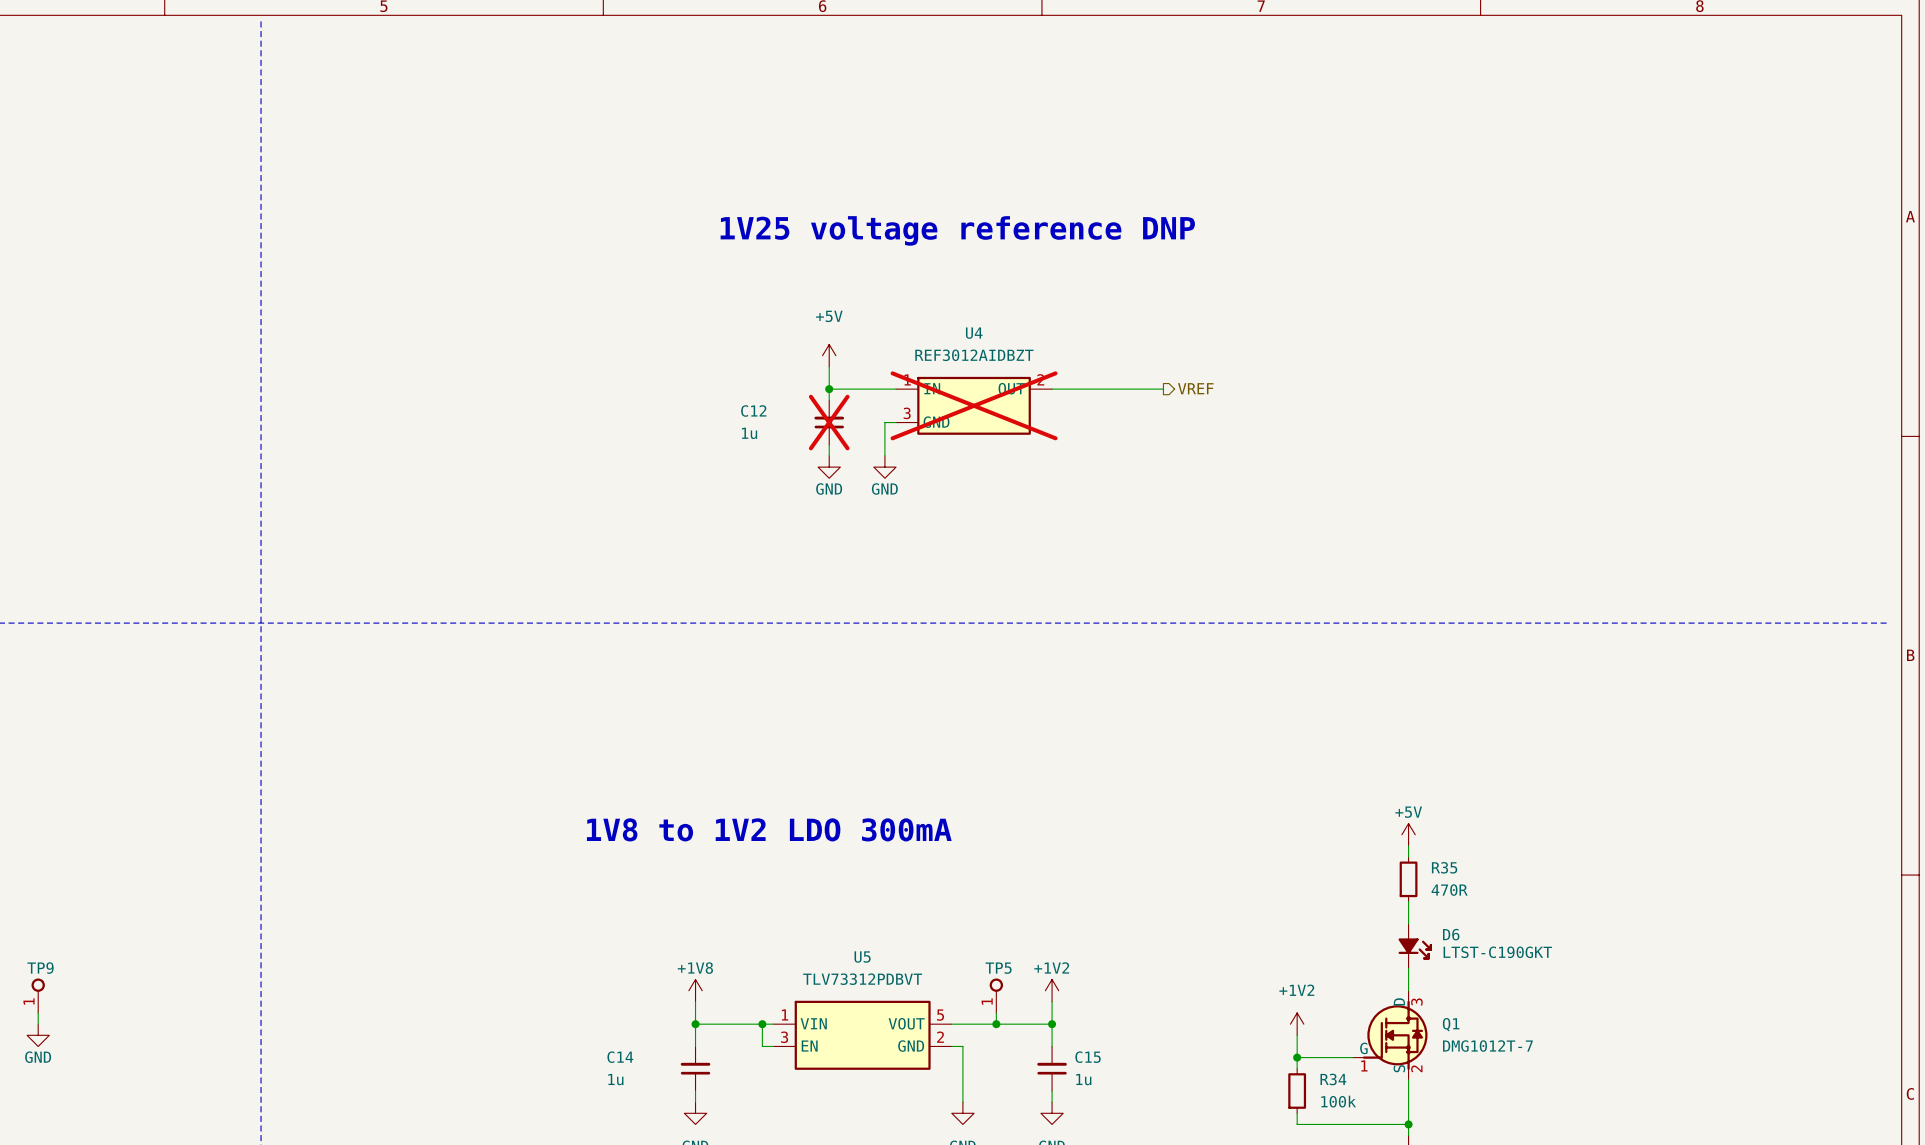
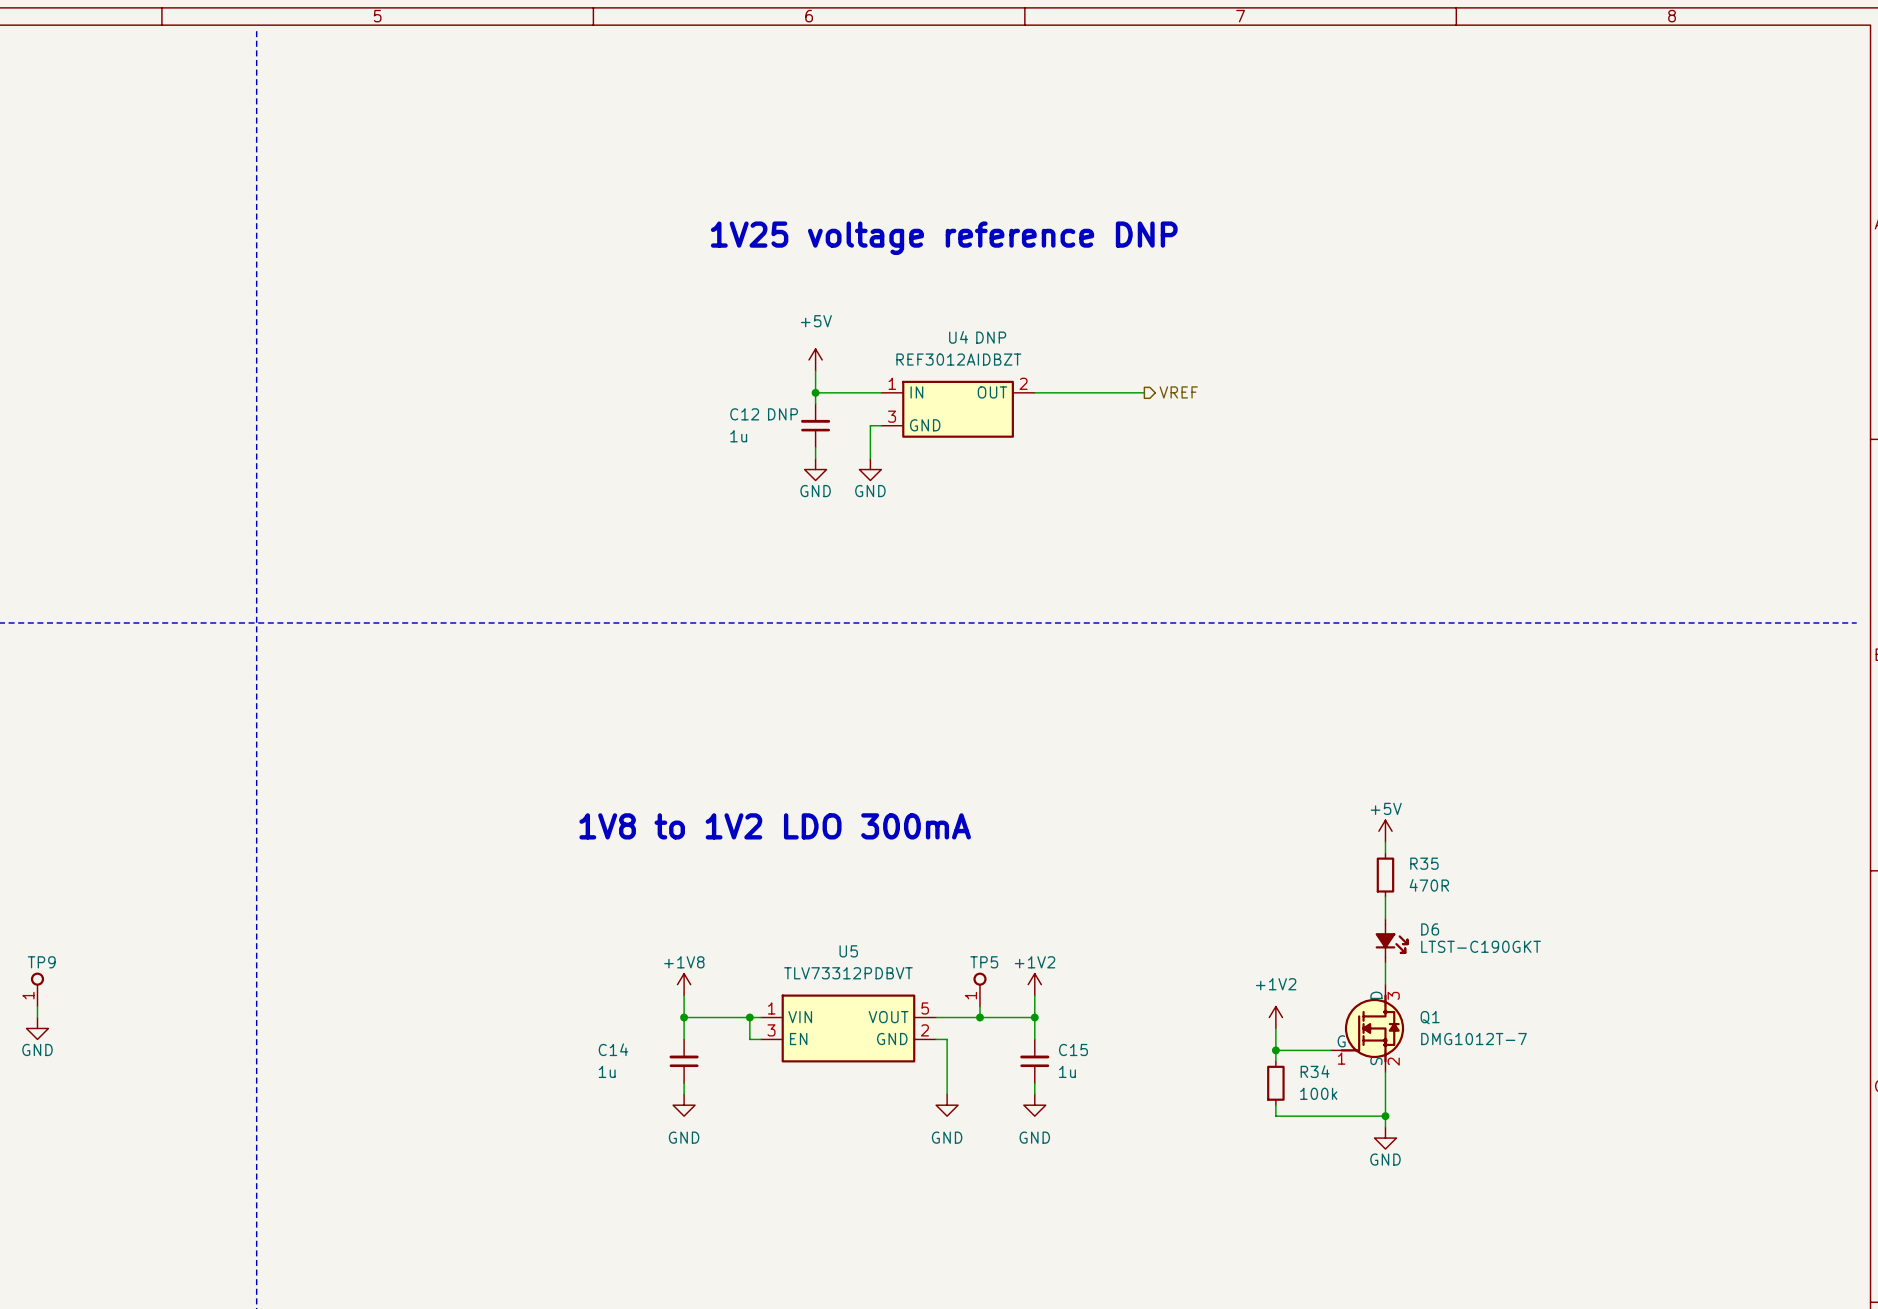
U4 text: none -> DNP (991, 337)
U4 do-not-place cross: (974, 405) -> none
C12 text: none -> DNP (782, 414)
C12 do-not-place cross: (829, 422) -> none

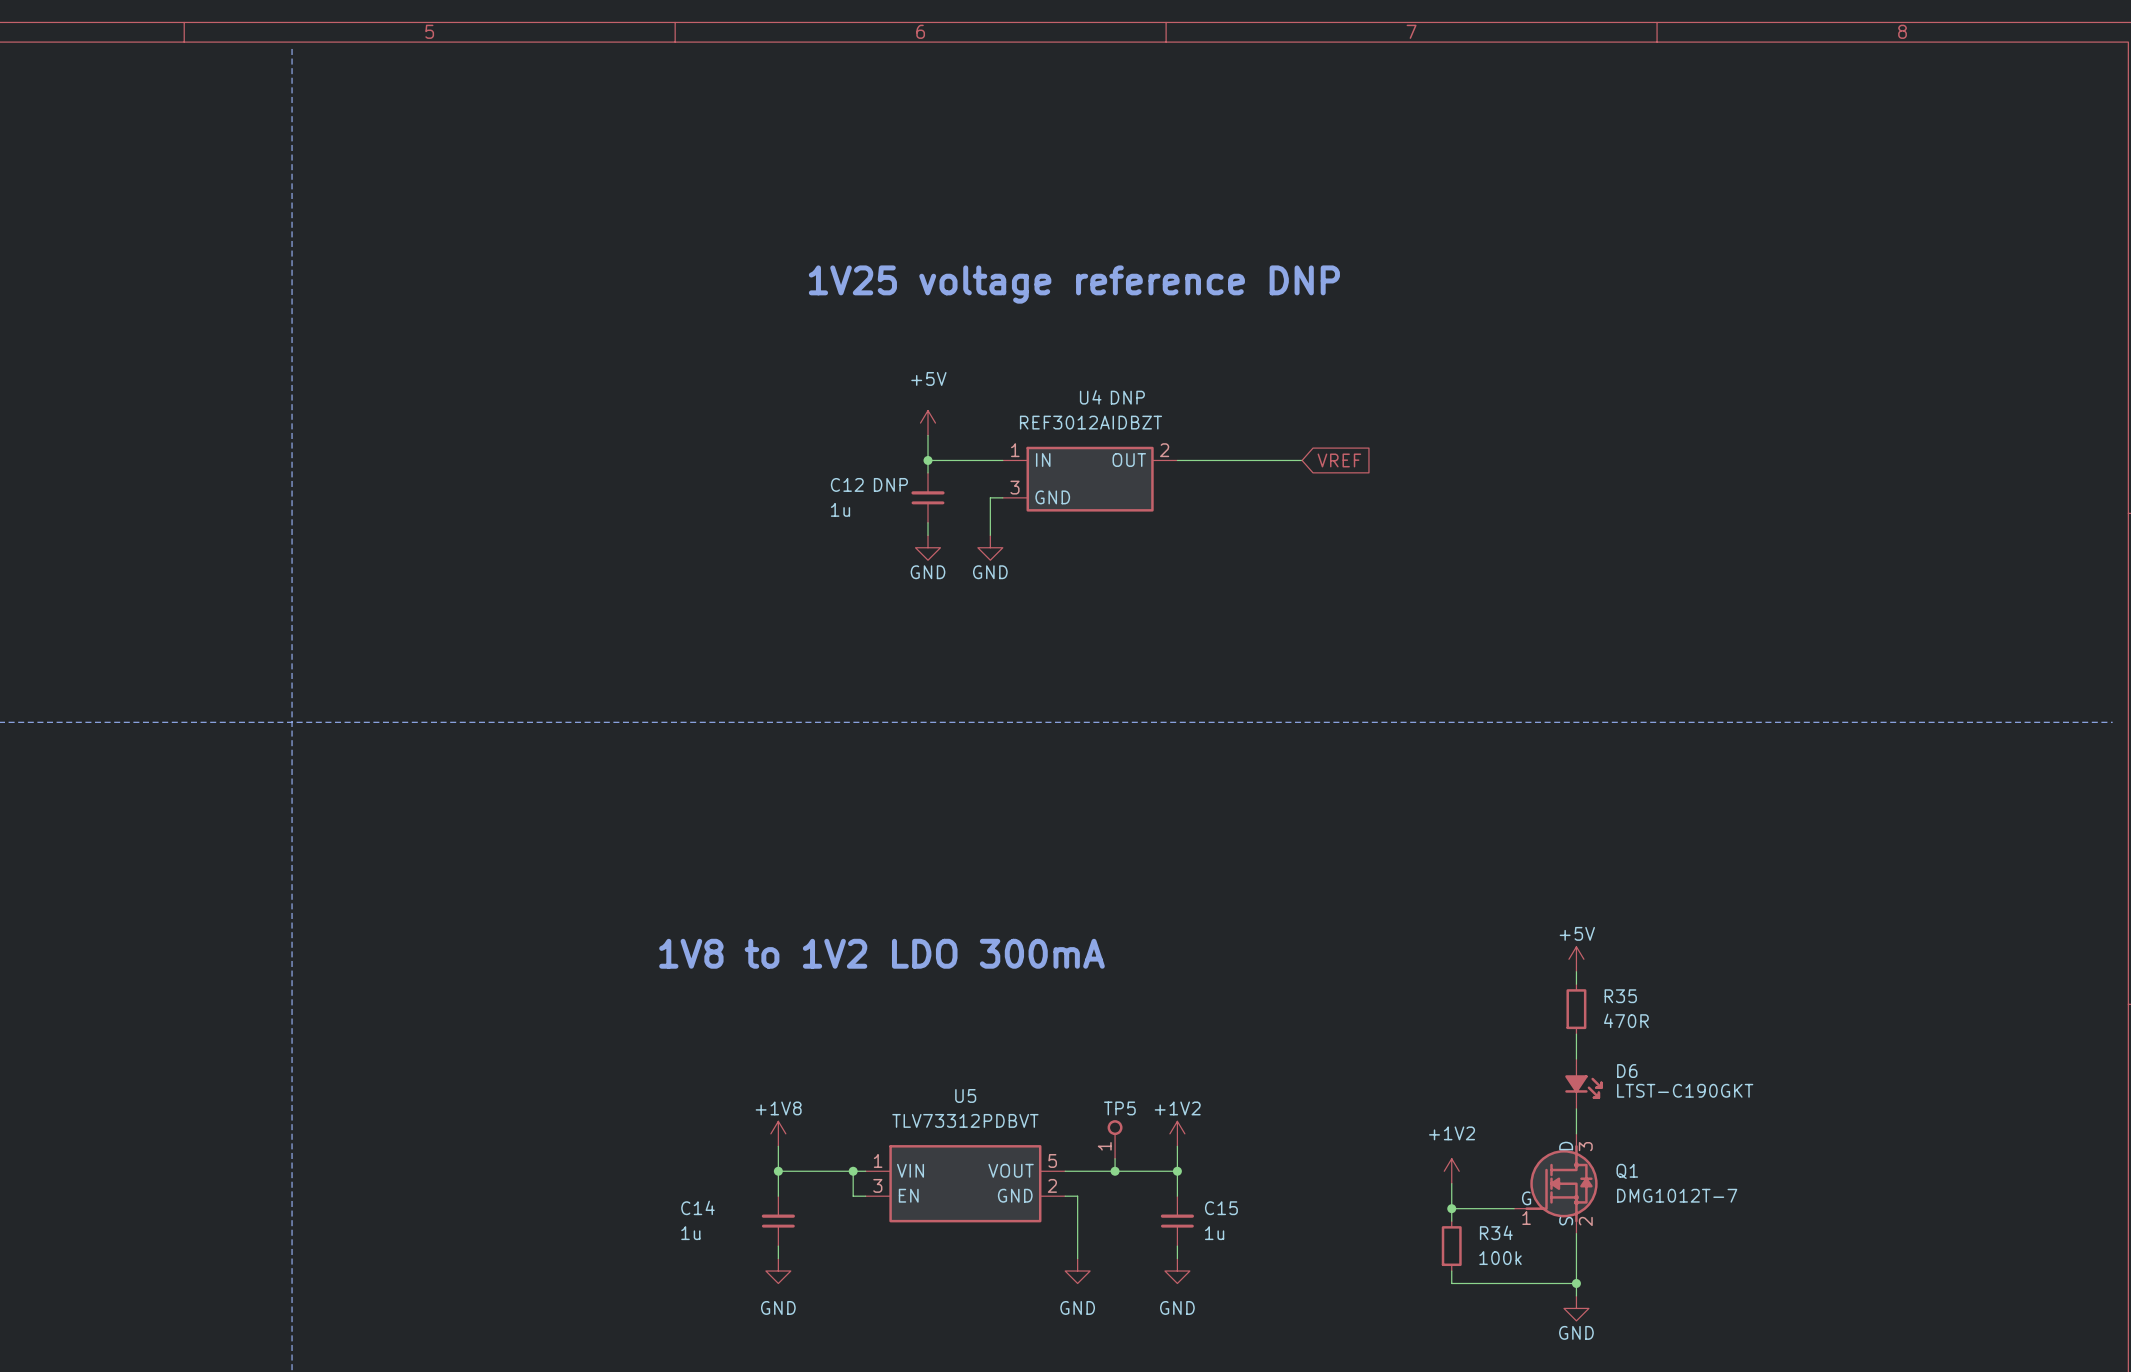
global label: none -> VREF (1339, 460)
hierarchical label: VREF (1178, 392) -> none
TP9: (37, 989) -> none
wire: (37, 1006) (37, 1017) -> none
power symbol: GND (37, 1028) -> none

